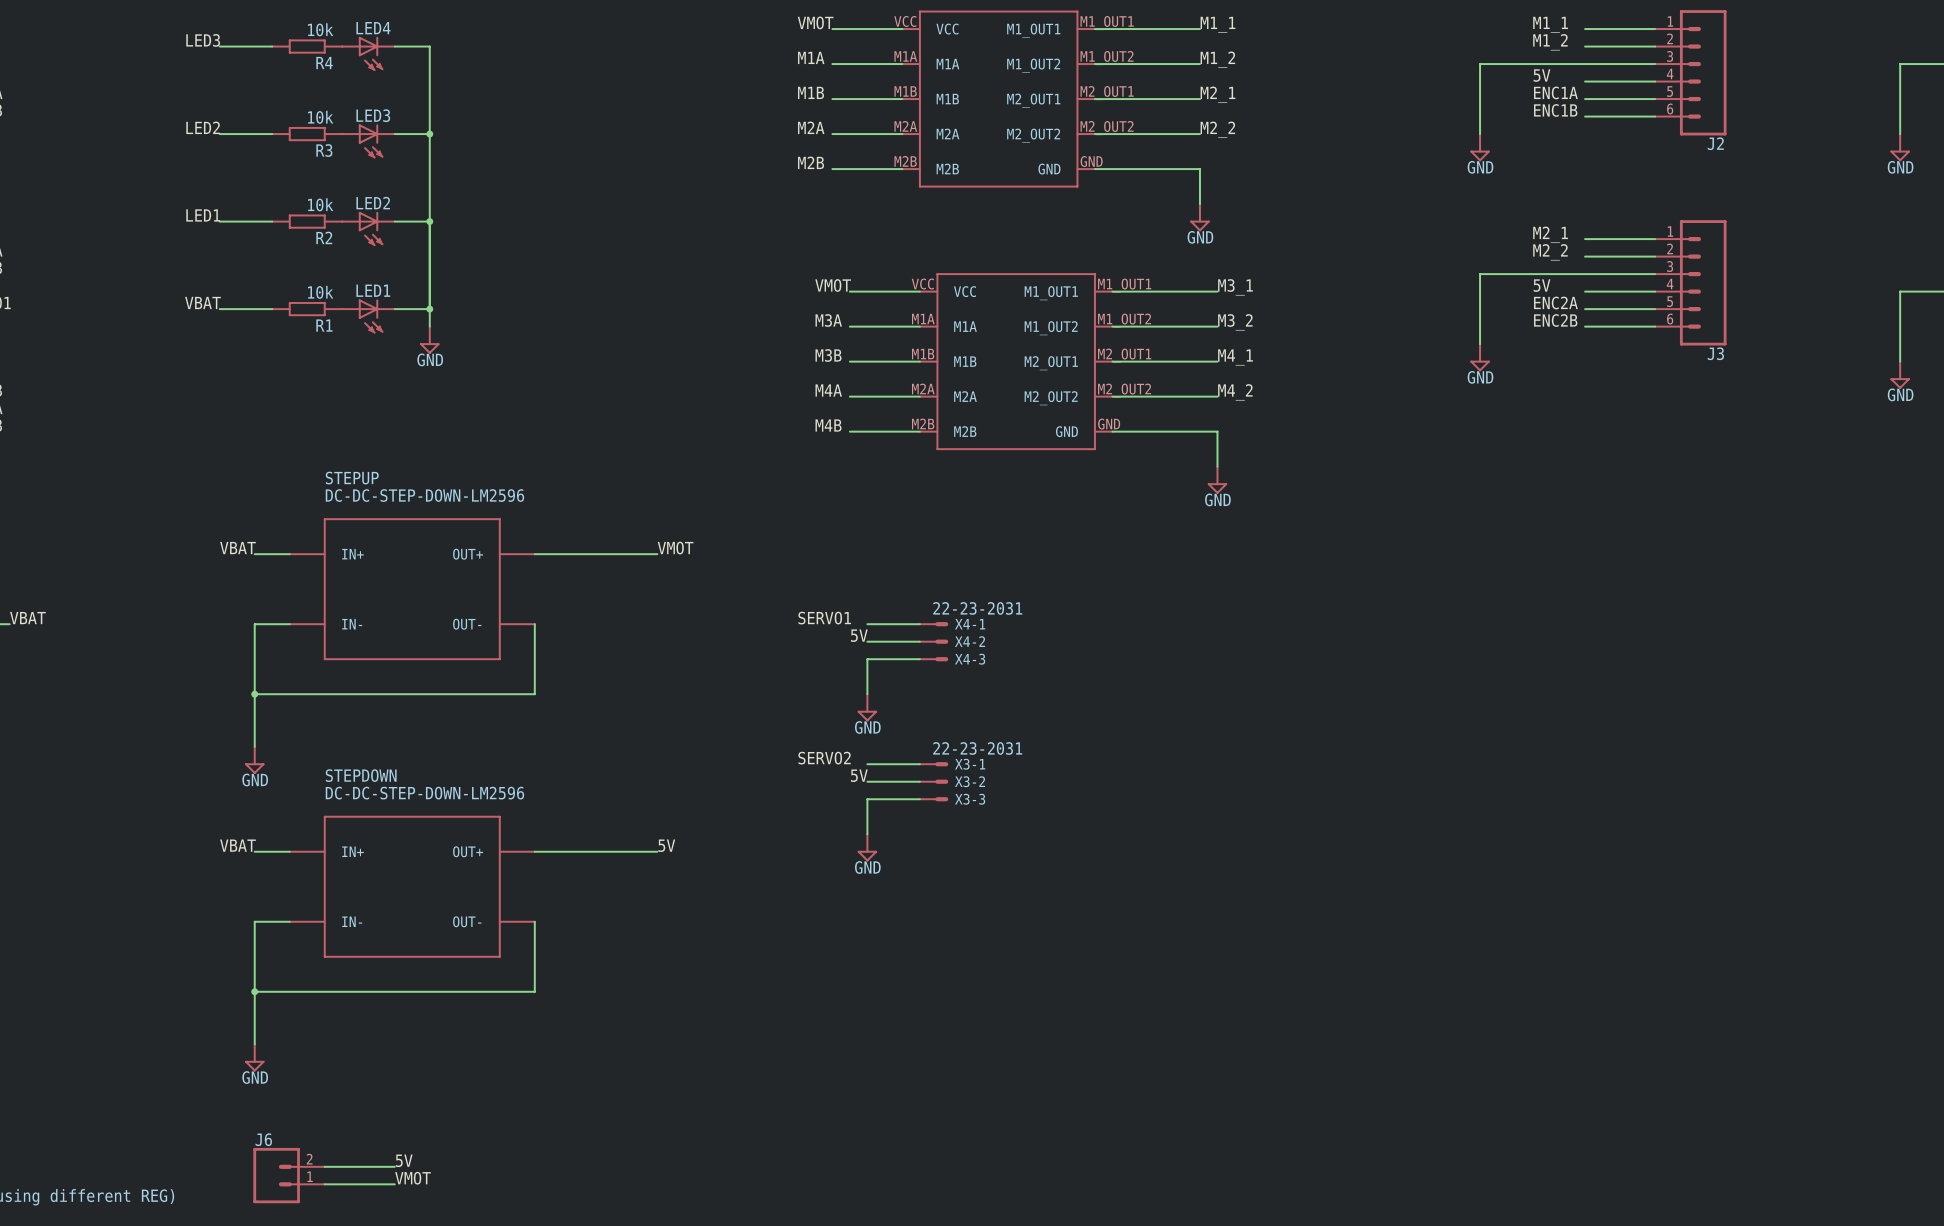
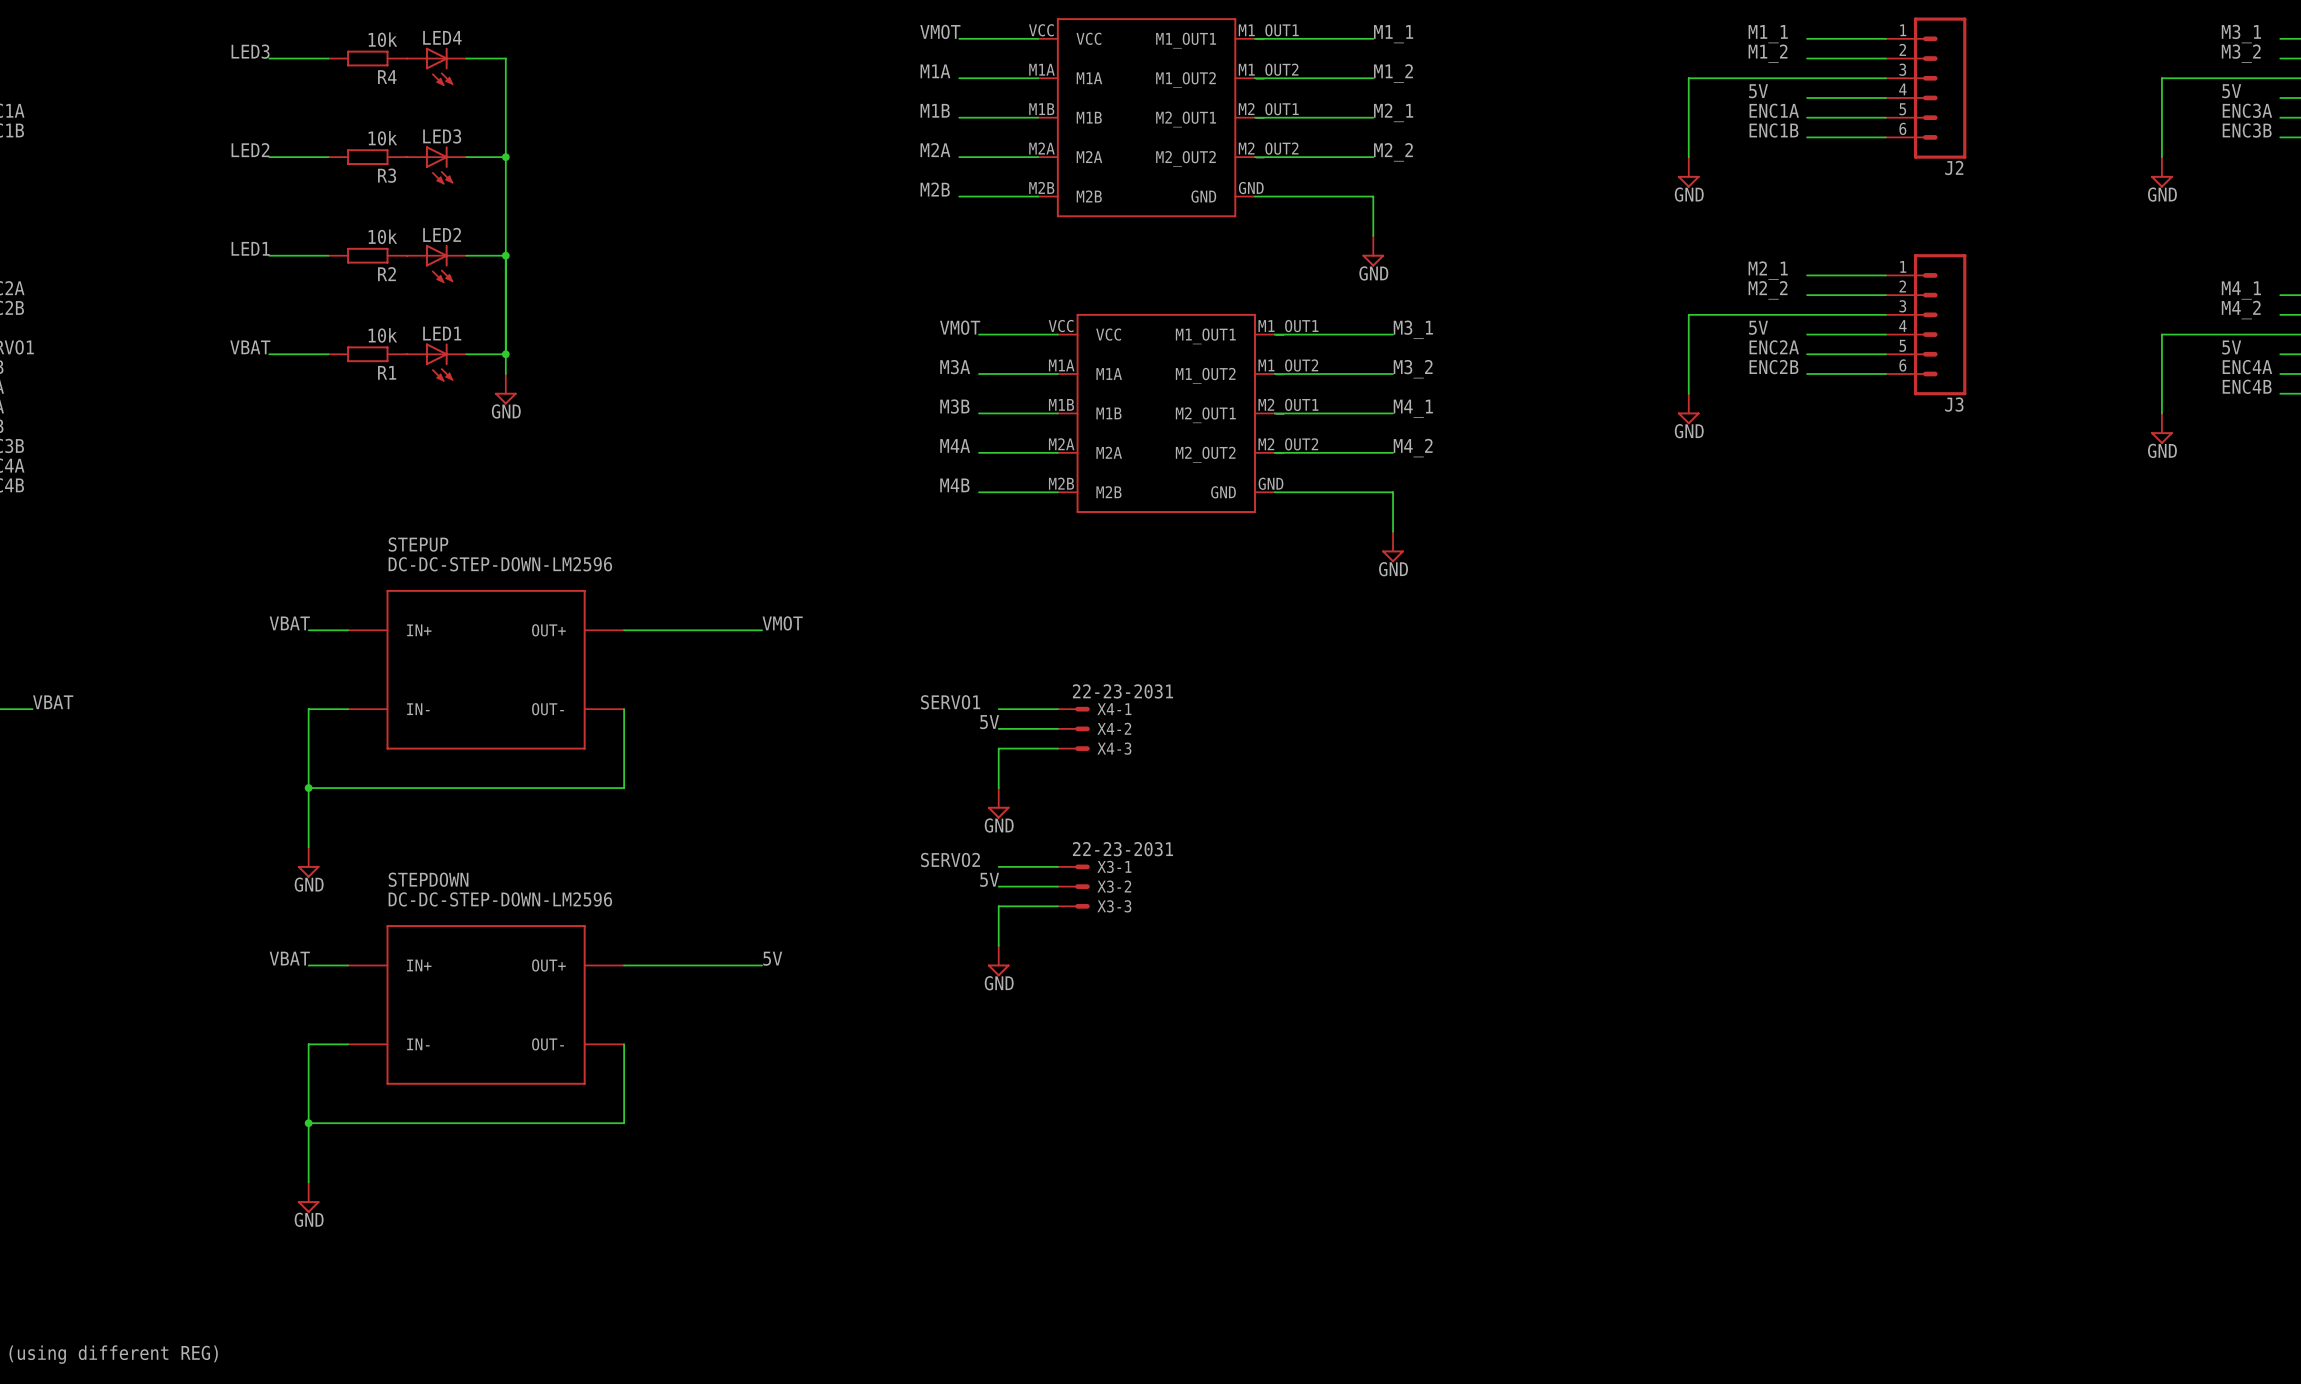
label: 5V (404, 1160) -> none
wire: (324, 1166) (394, 1166) -> none
J6: (289, 1175) -> none
label: VMOT (413, 1178) -> none
wire: (324, 1184) (394, 1184) -> none

